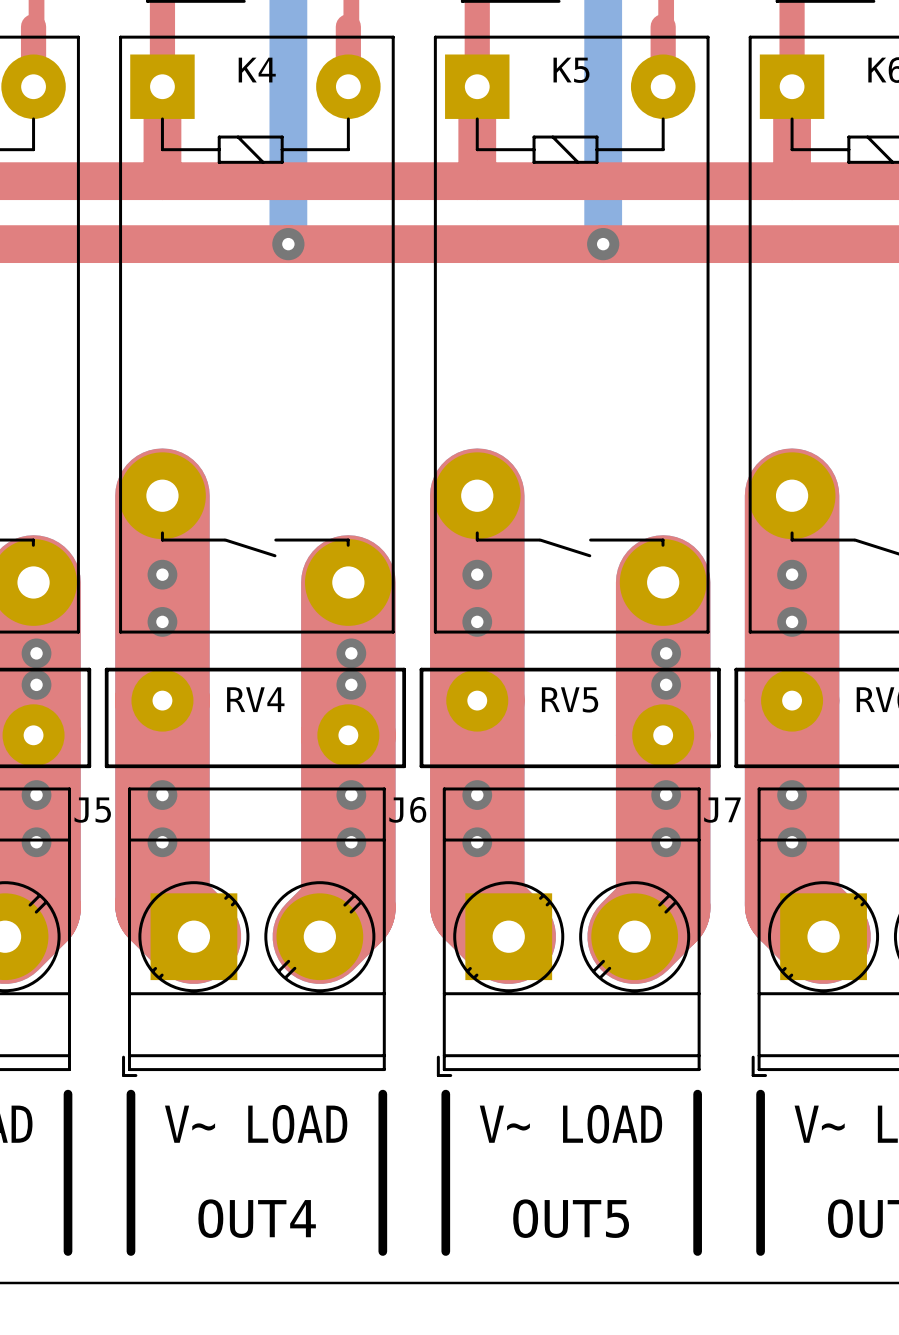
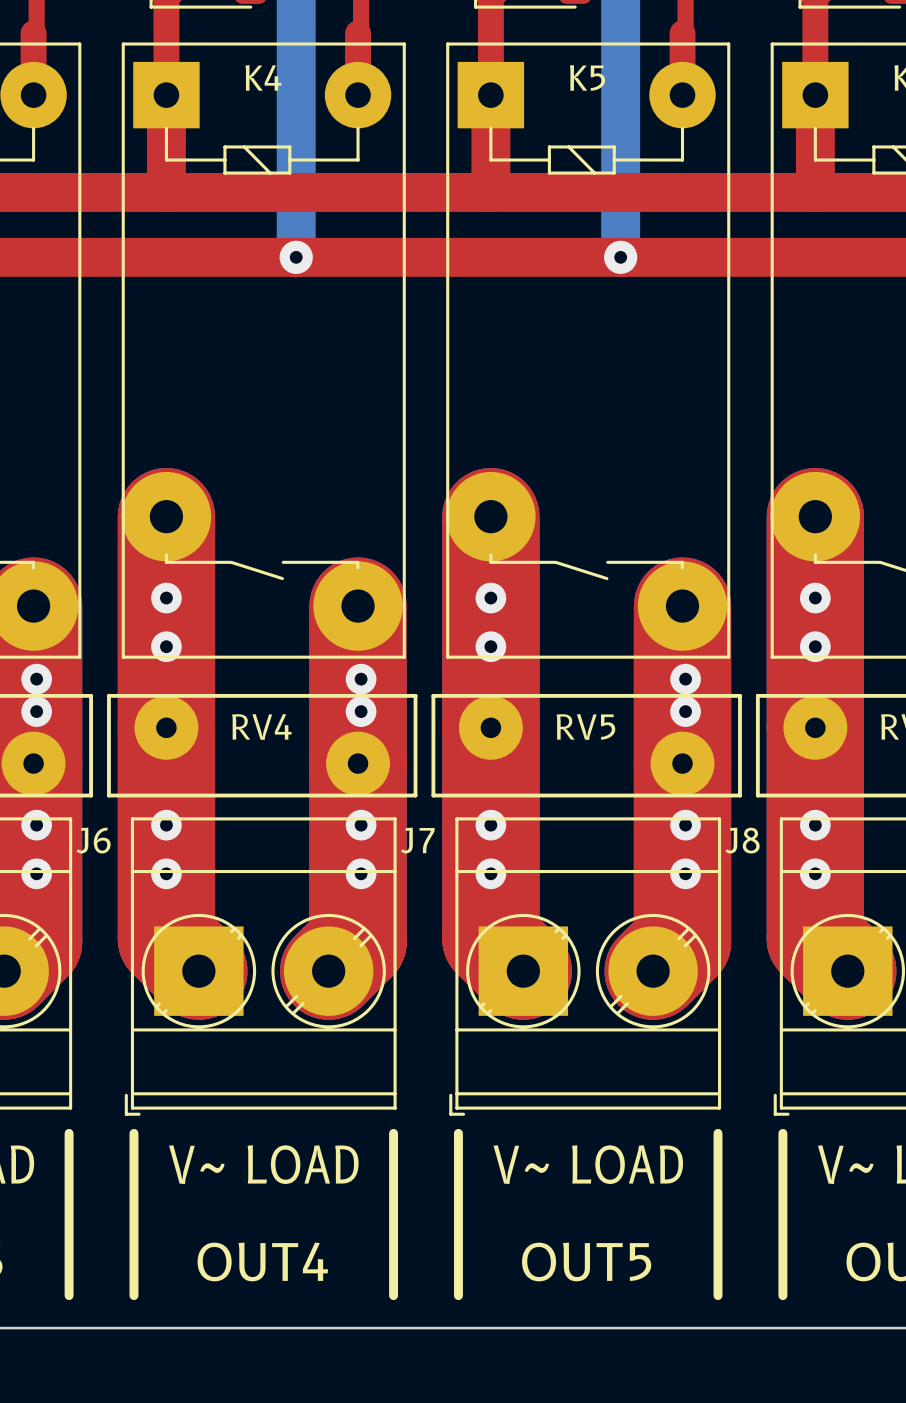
J6 name: J6 (407, 809) -> J7 (417, 840)
J5 name: J5 (92, 810) -> J6 (93, 840)
J7 name: J7 (722, 810) -> J8 (742, 840)

